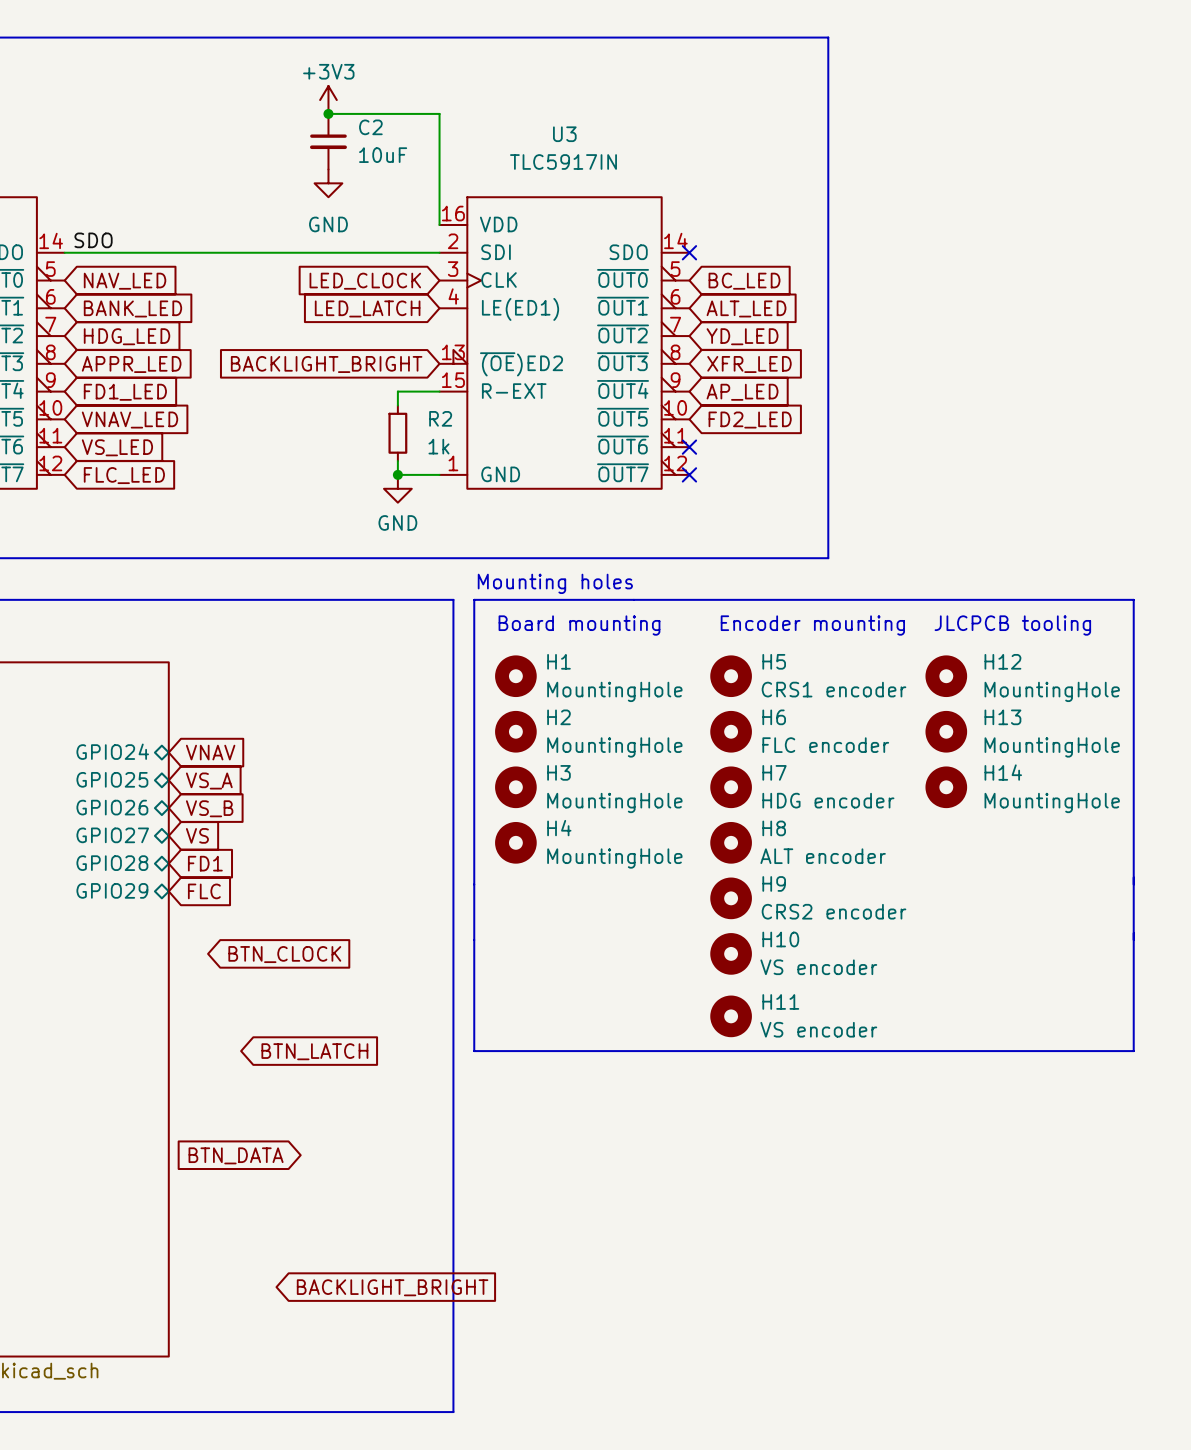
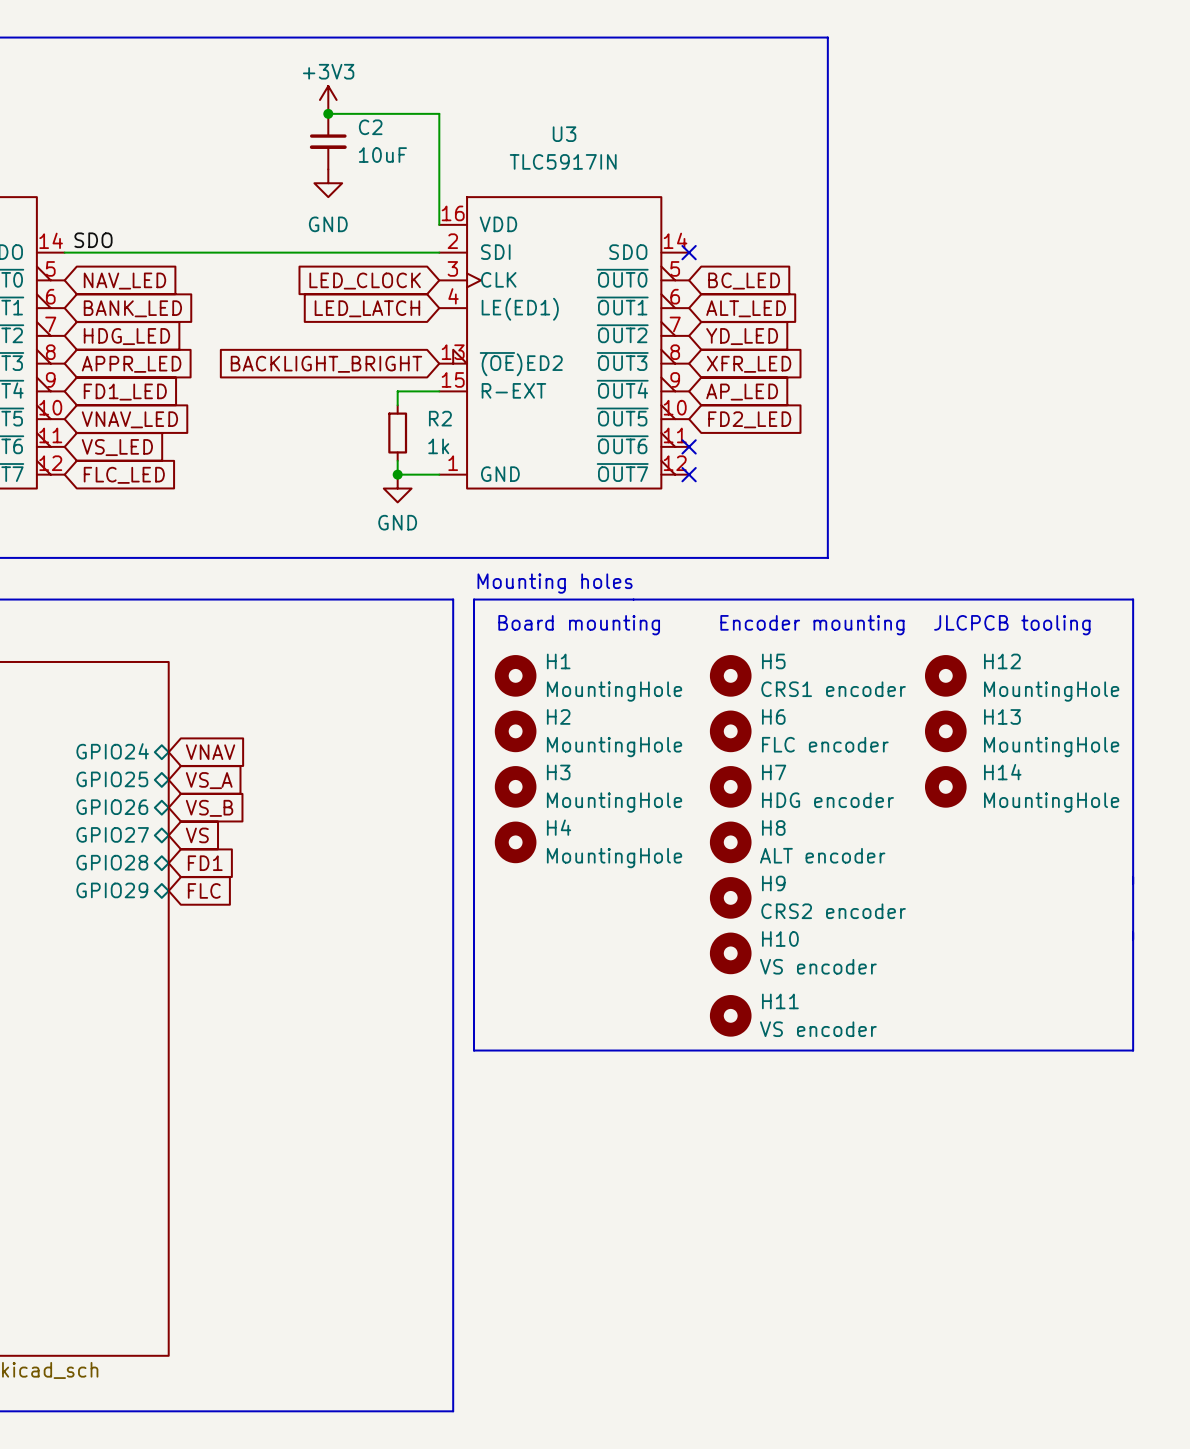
global label: BTN_CLOCK (284, 954) -> none
global label: BTN_LATCH (314, 1051) -> none
global label: BTN_DATA (236, 1155) -> none
global label: BACKLIGHT_BRIGHT (392, 1287) -> none

